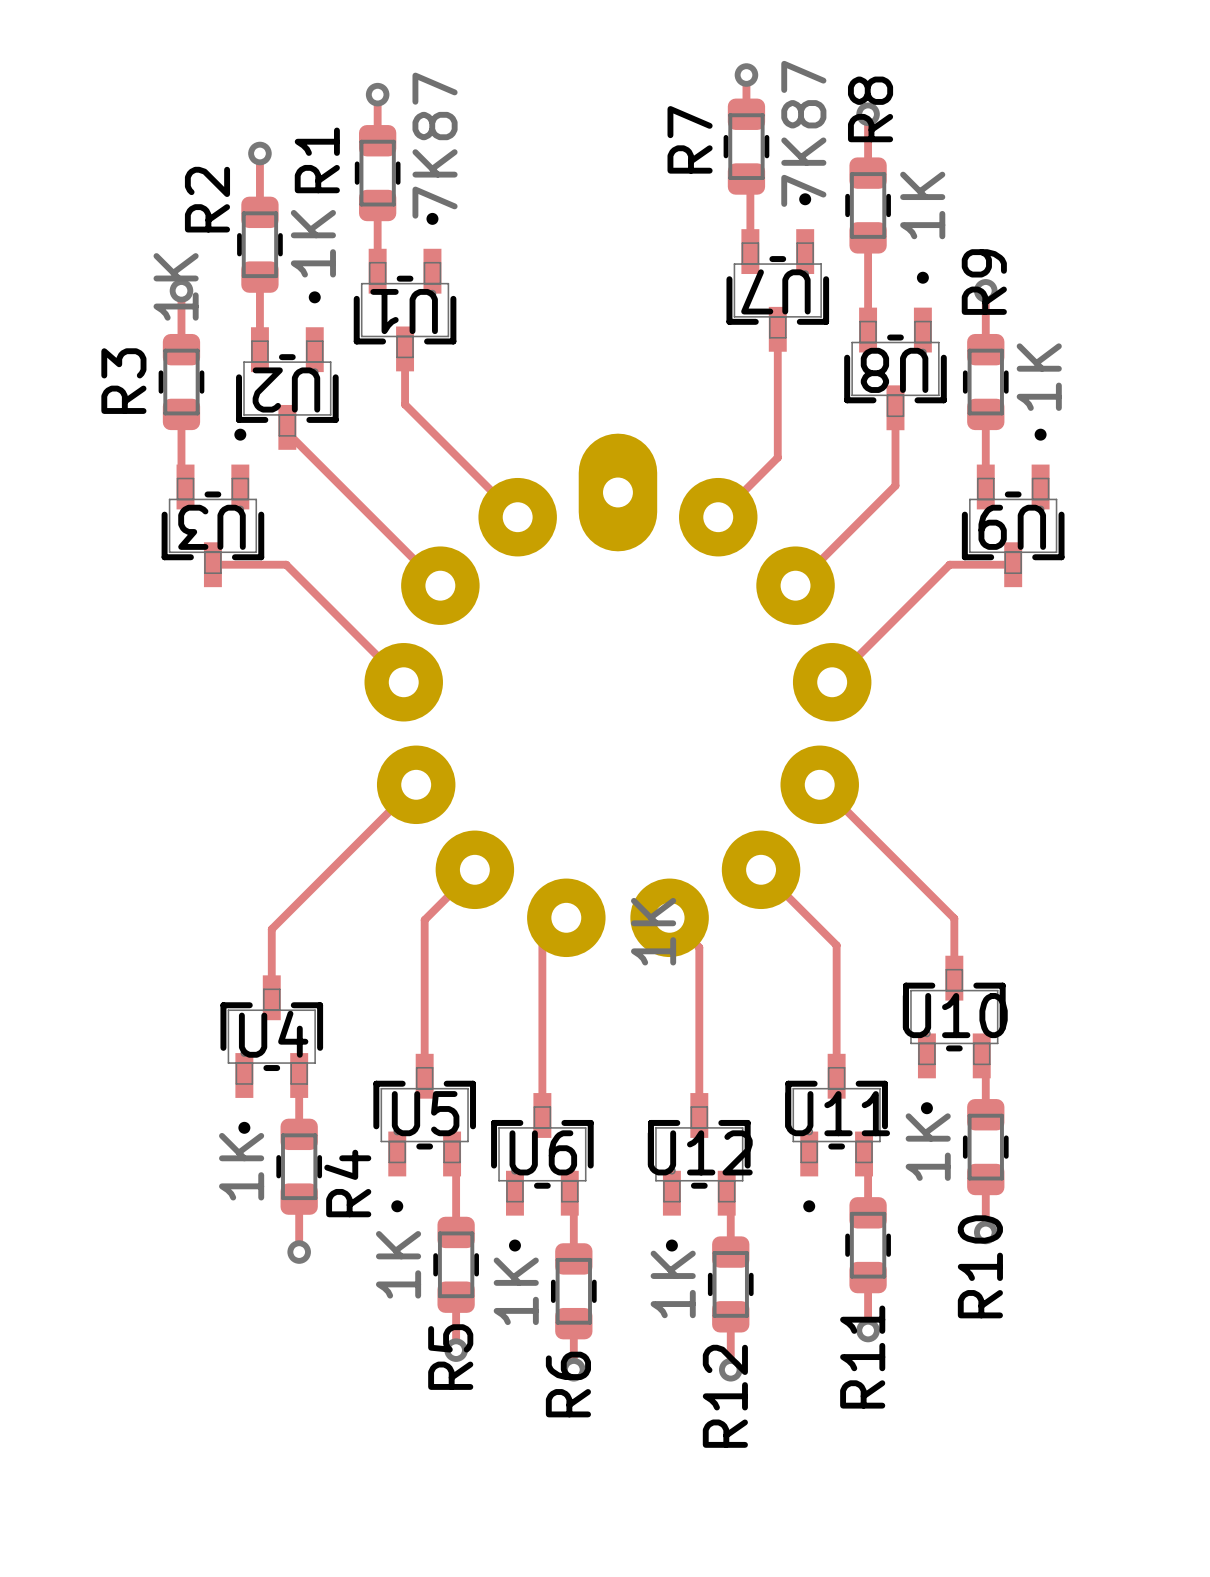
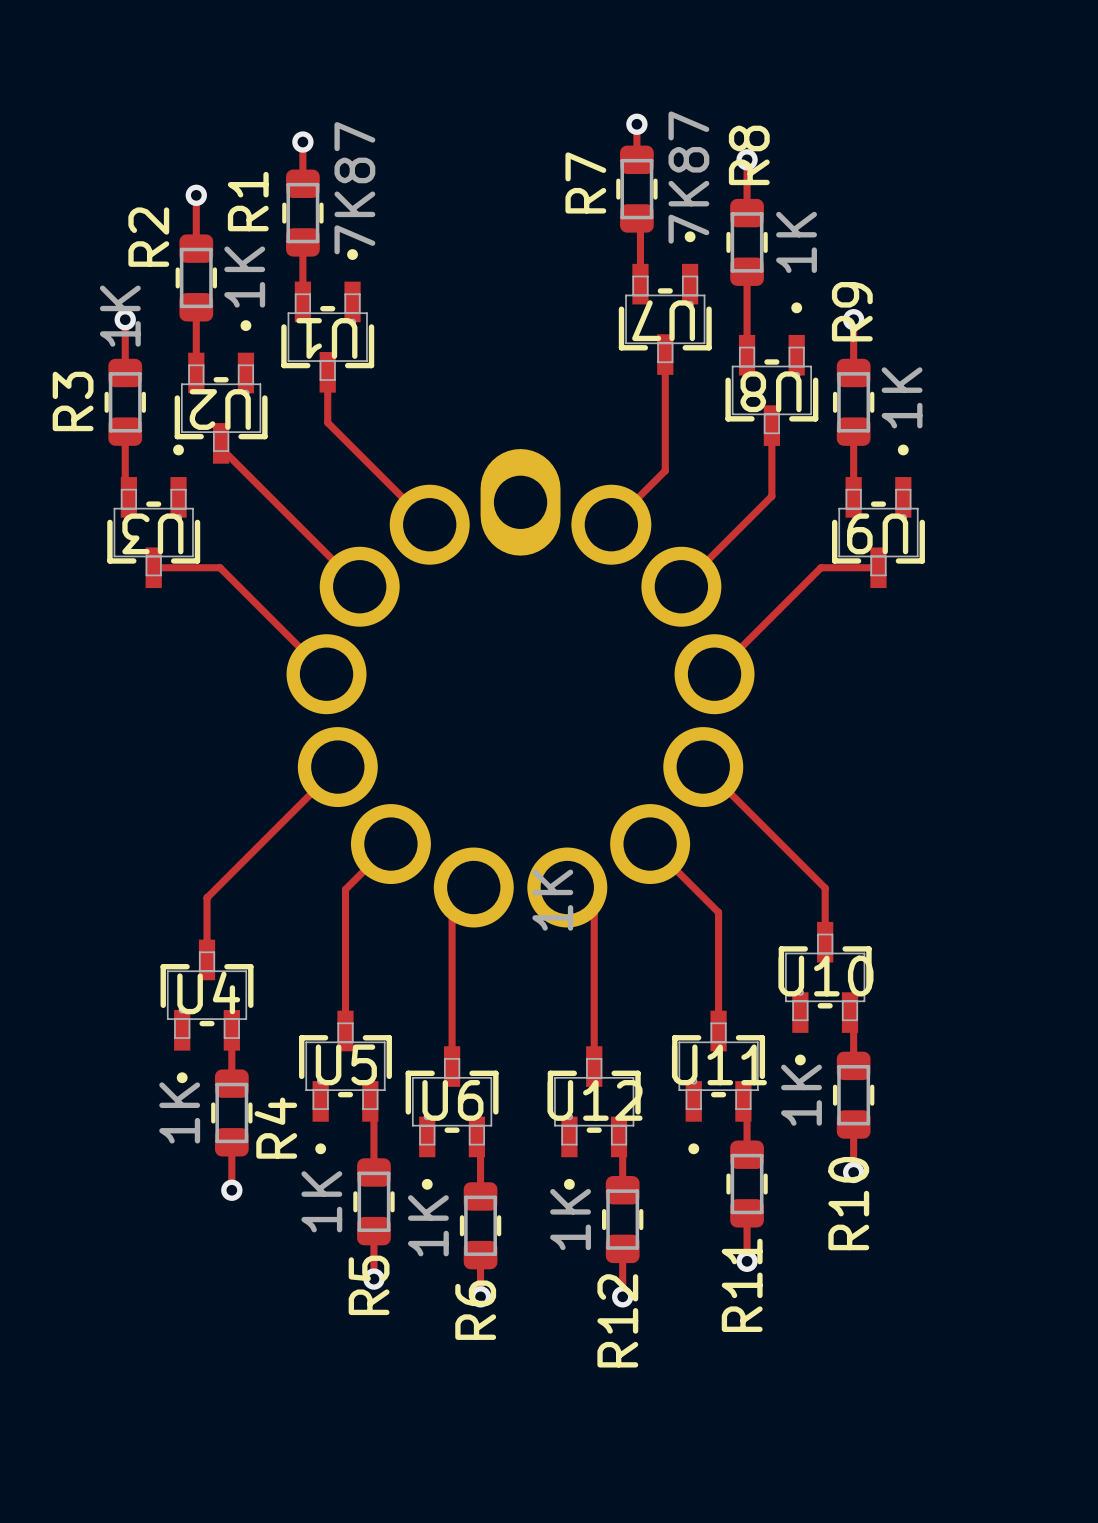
part footprint: [364, 433, 872, 958] -> [286, 449, 755, 928]

